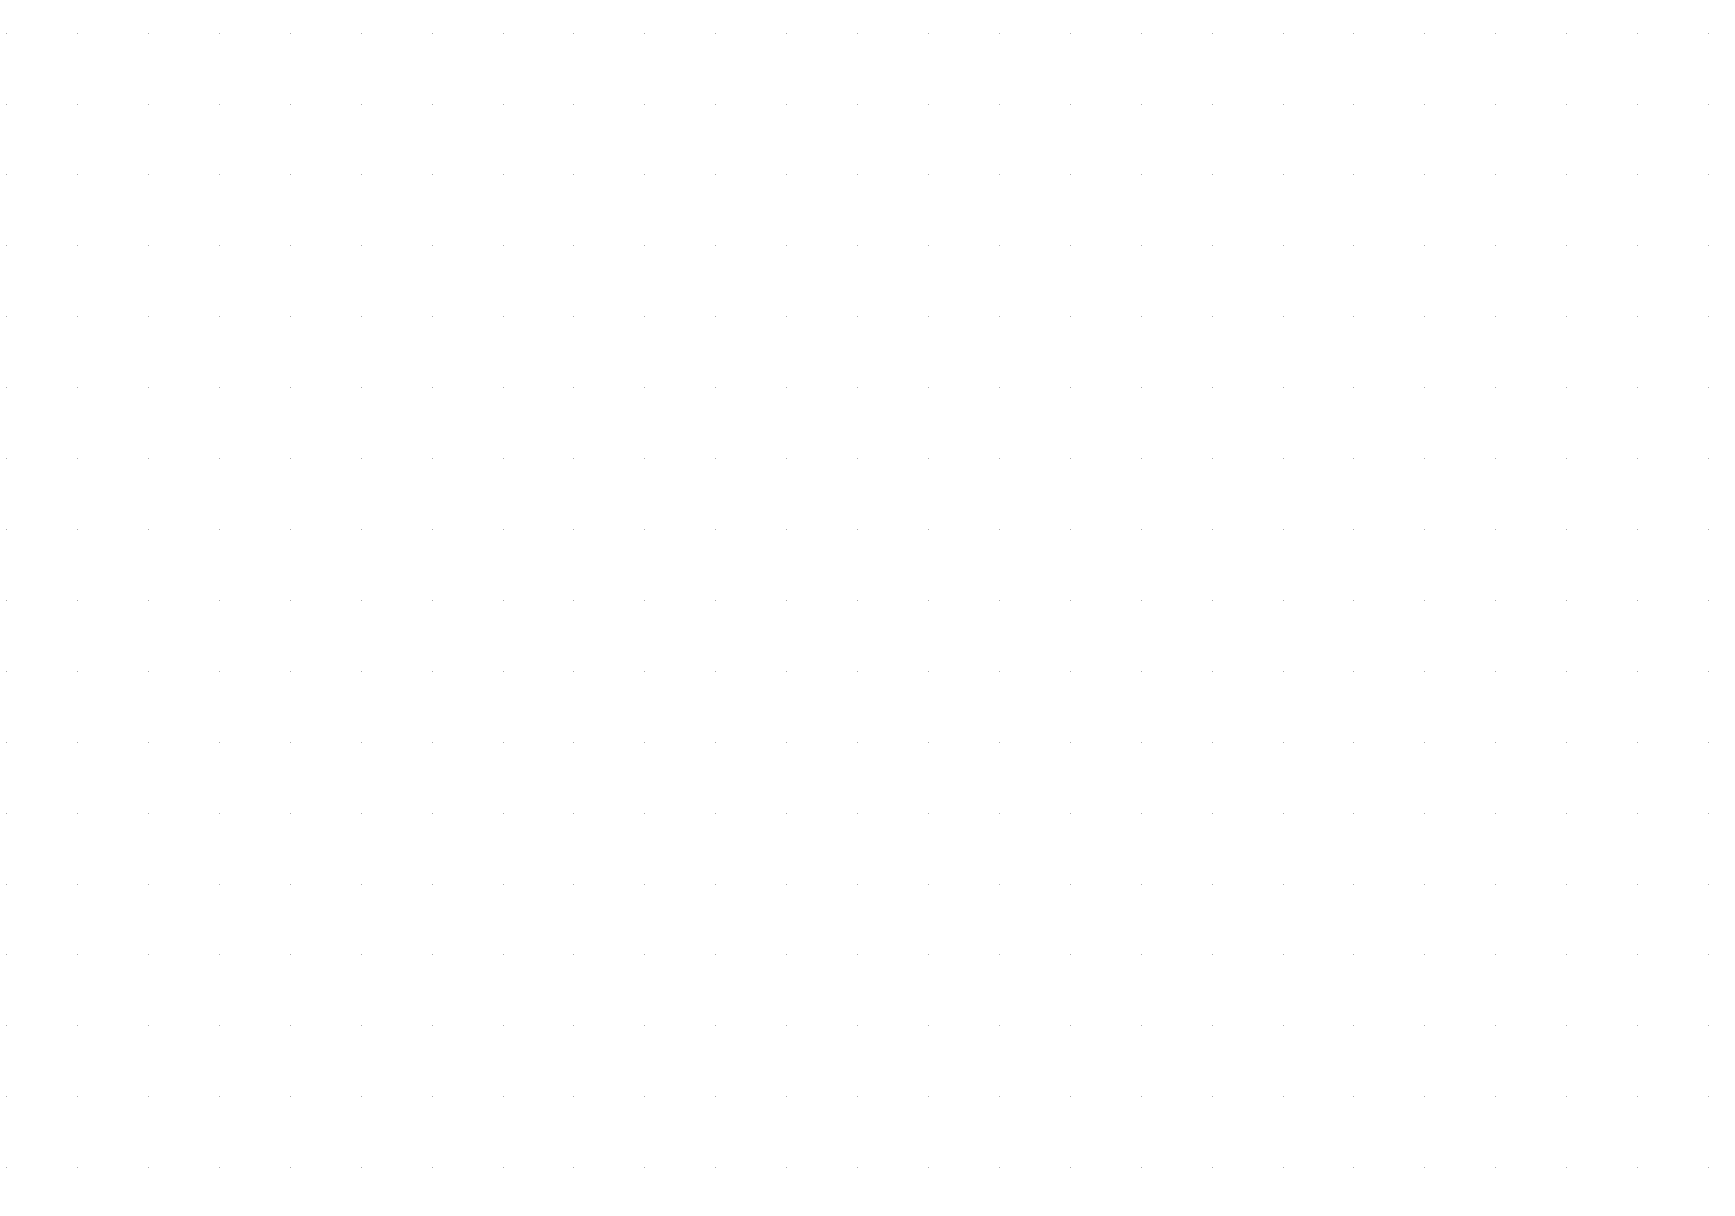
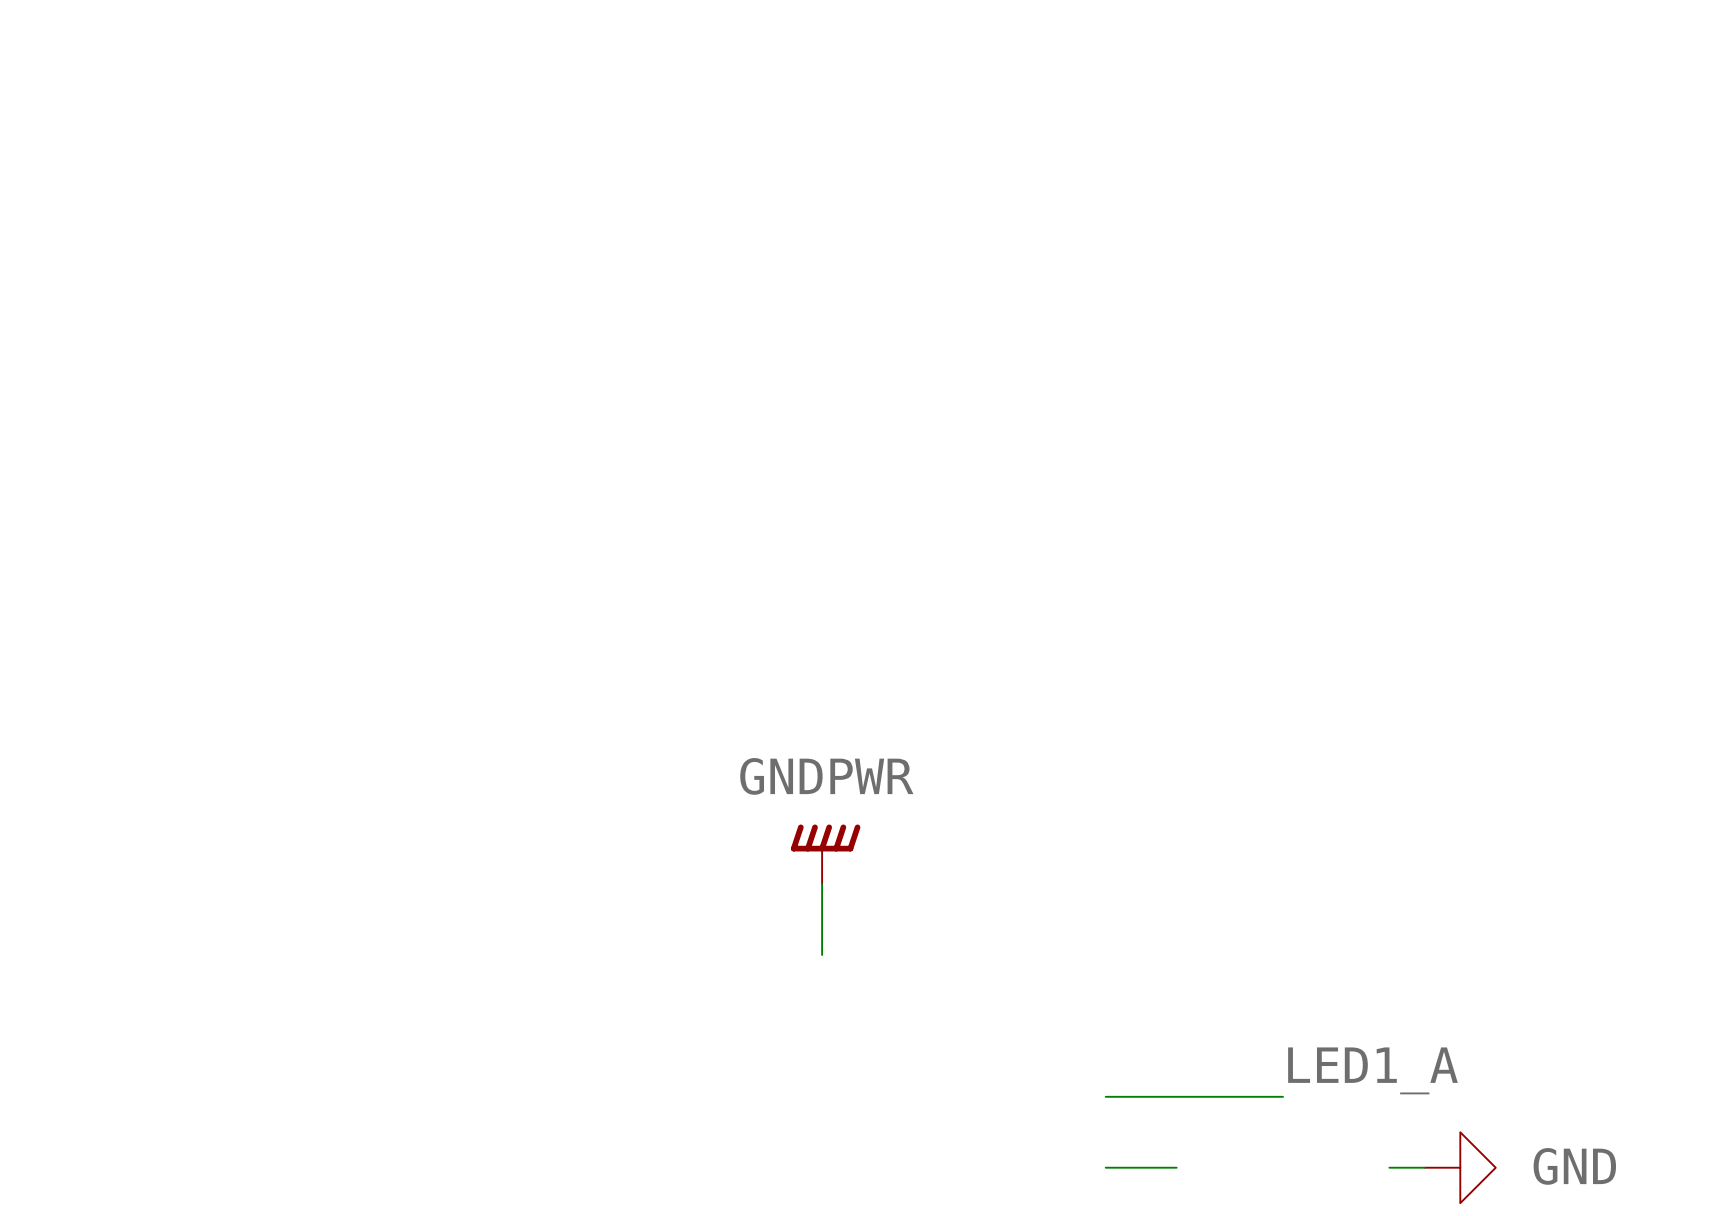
power symbol: none -> GNDPWR (825, 854)
wire: none -> (822, 884) (822, 954)
label: none -> LED1_A (1372, 1070)
wire: none -> (1105, 1096) (1283, 1096)
wire: none -> (1105, 1167) (1176, 1167)
wire: none -> (1389, 1167) (1424, 1167)
power symbol: none -> GND (1460, 1167)

